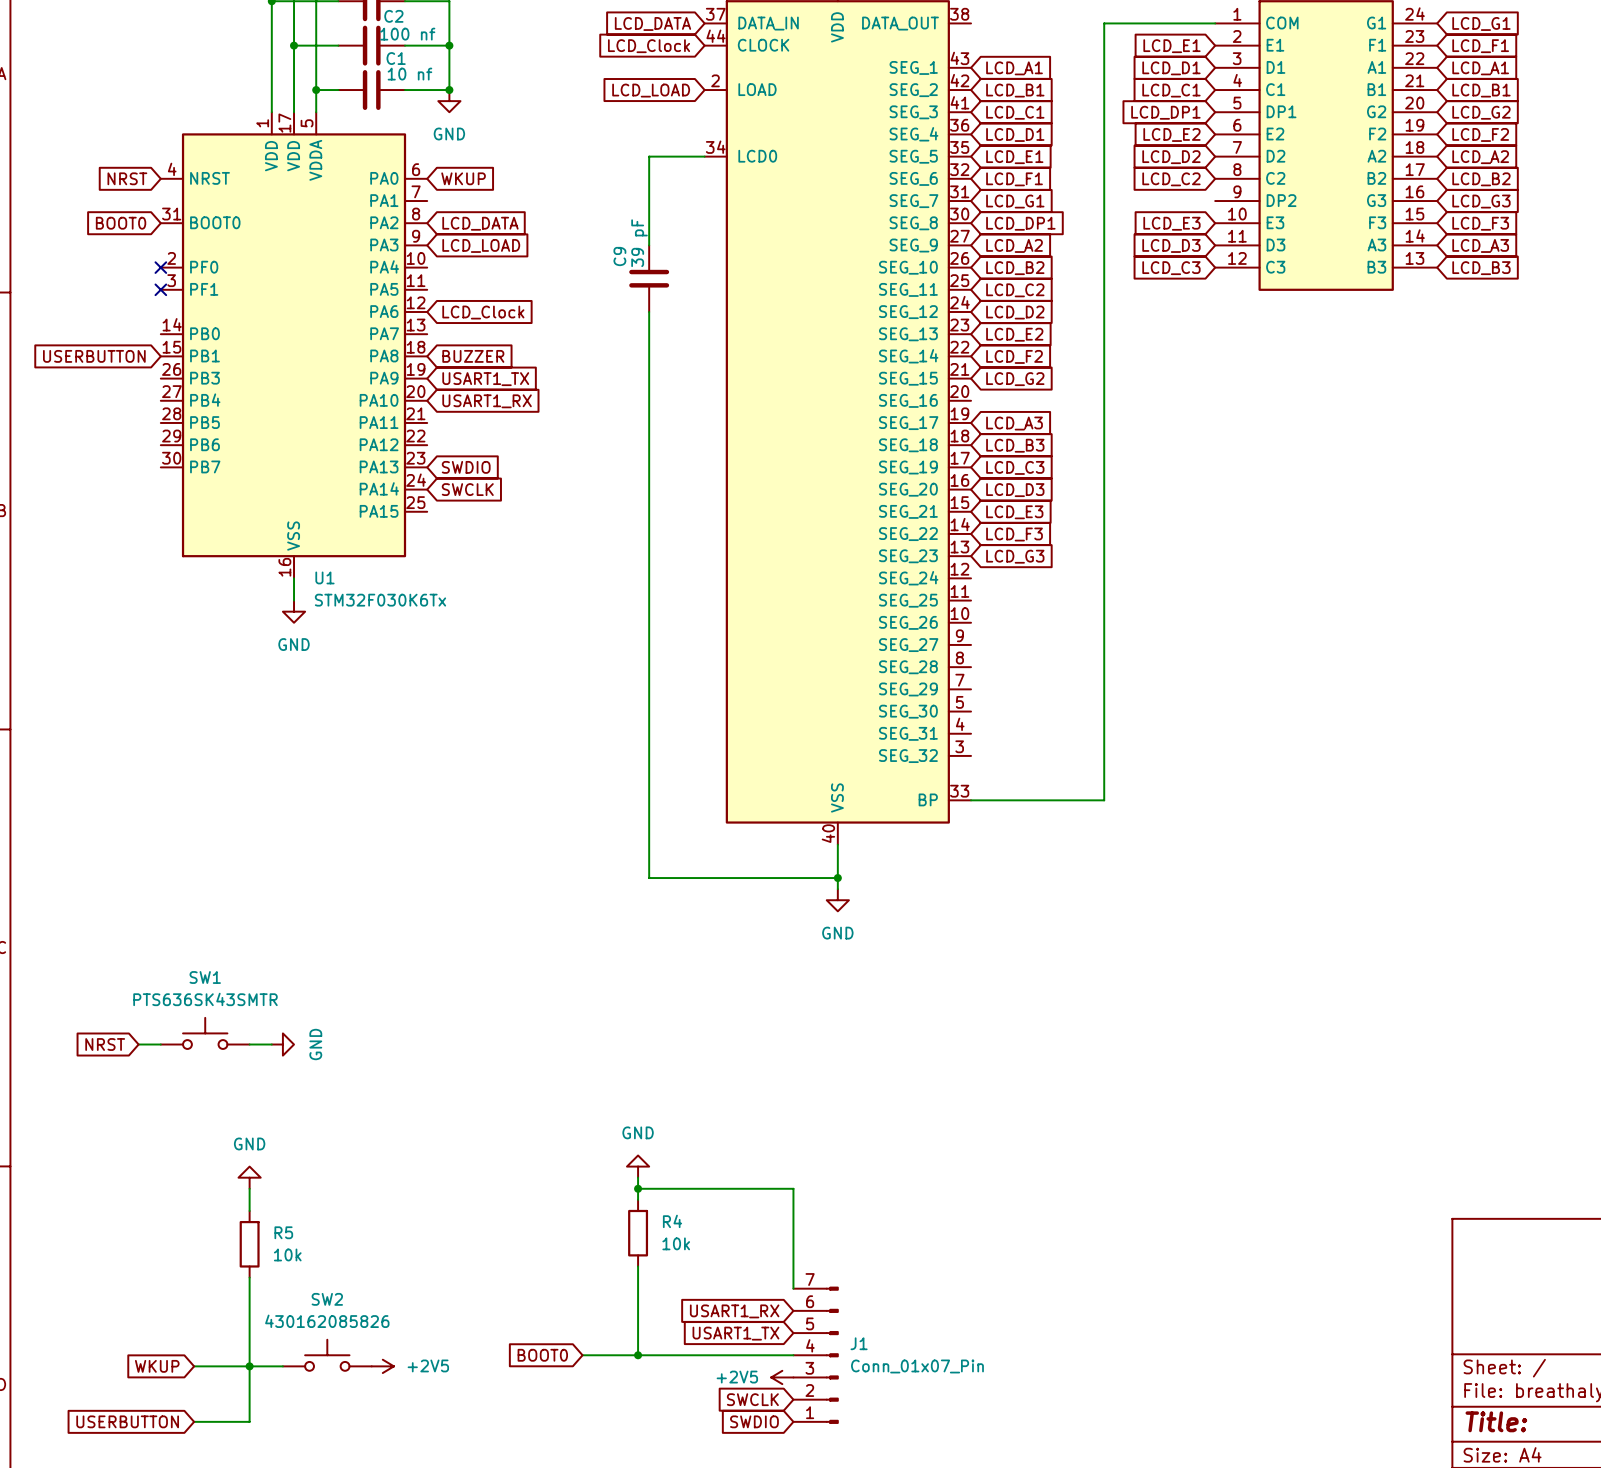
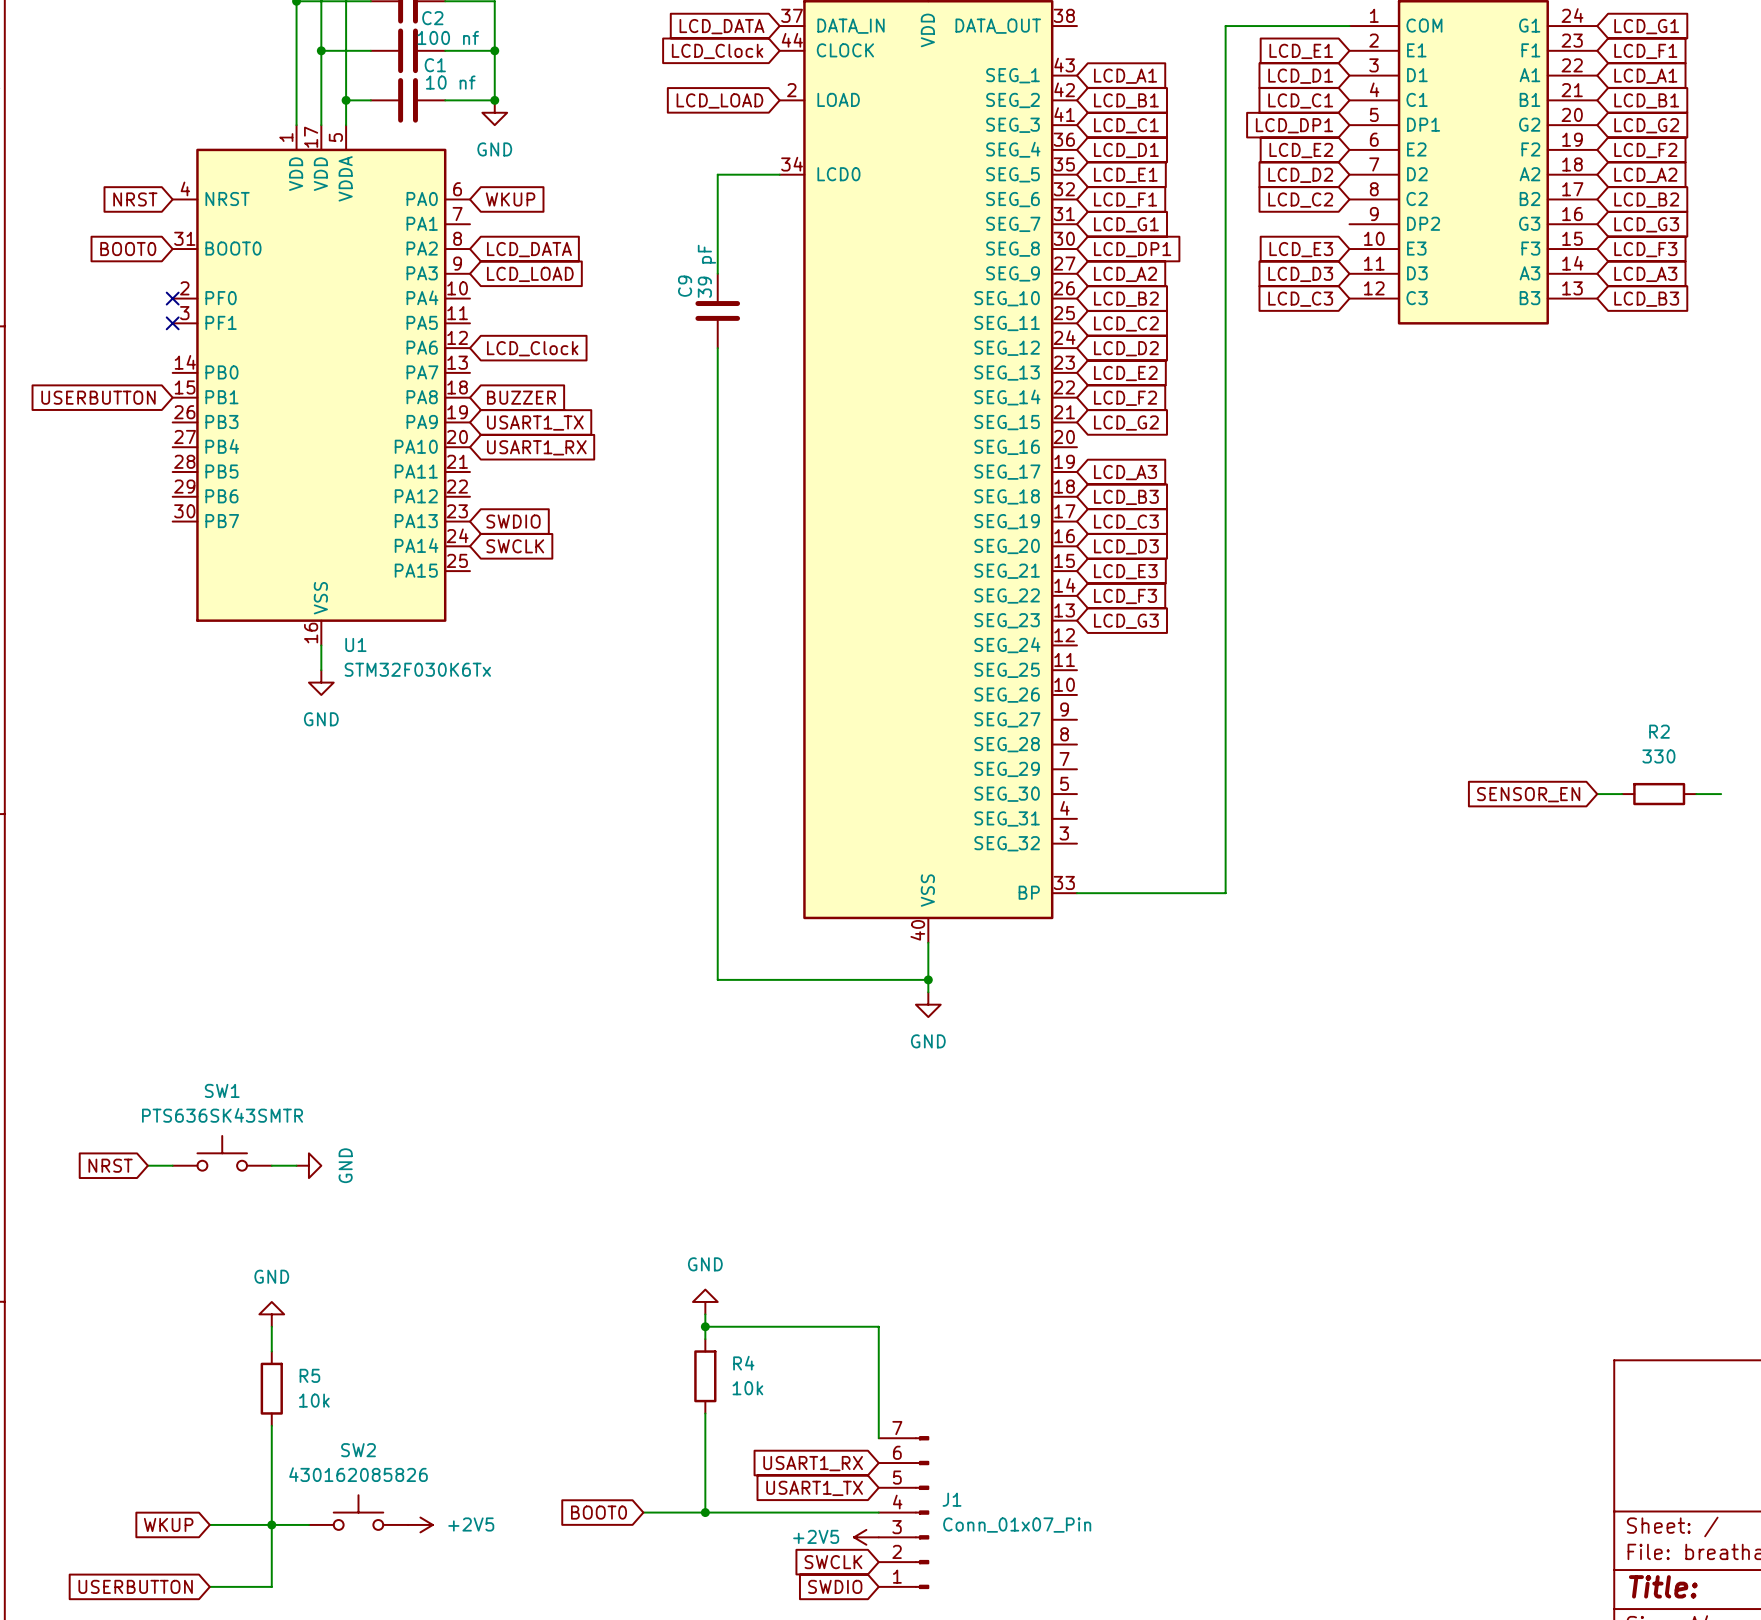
wire: none -> (1597, 794) (1622, 794)
R2: none -> 330 (1659, 794)
wire: none -> (1696, 794) (1721, 794)
global label: none -> SENSOR_EN (1528, 794)

